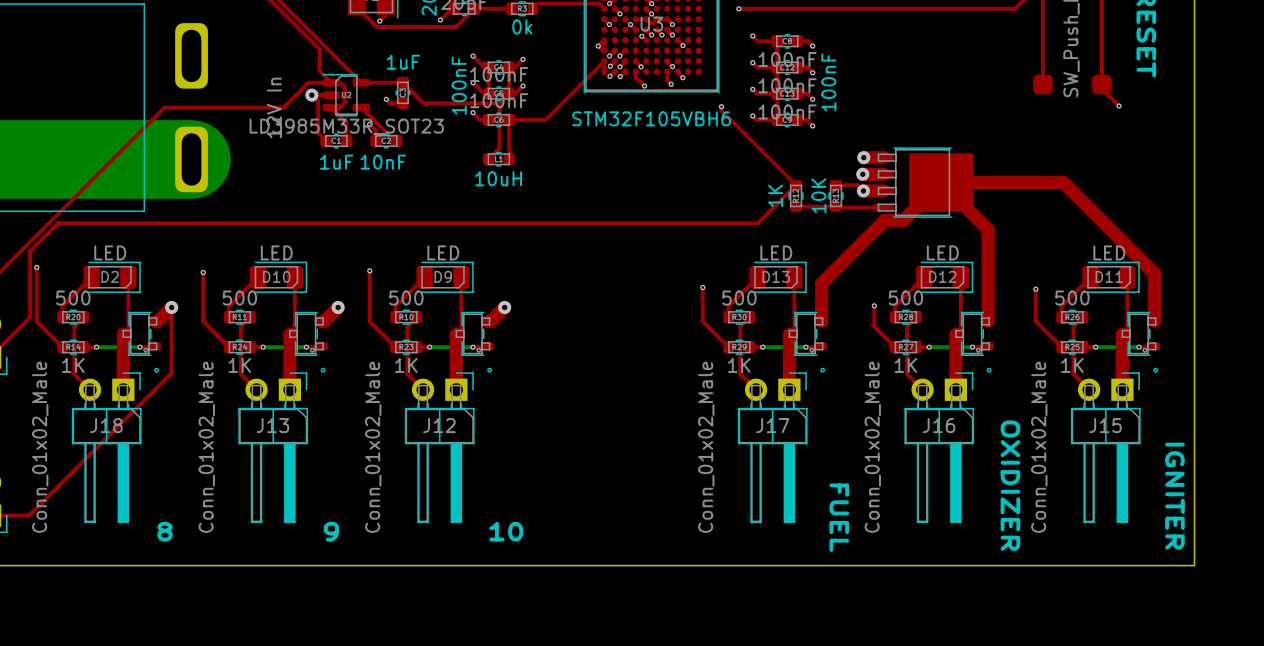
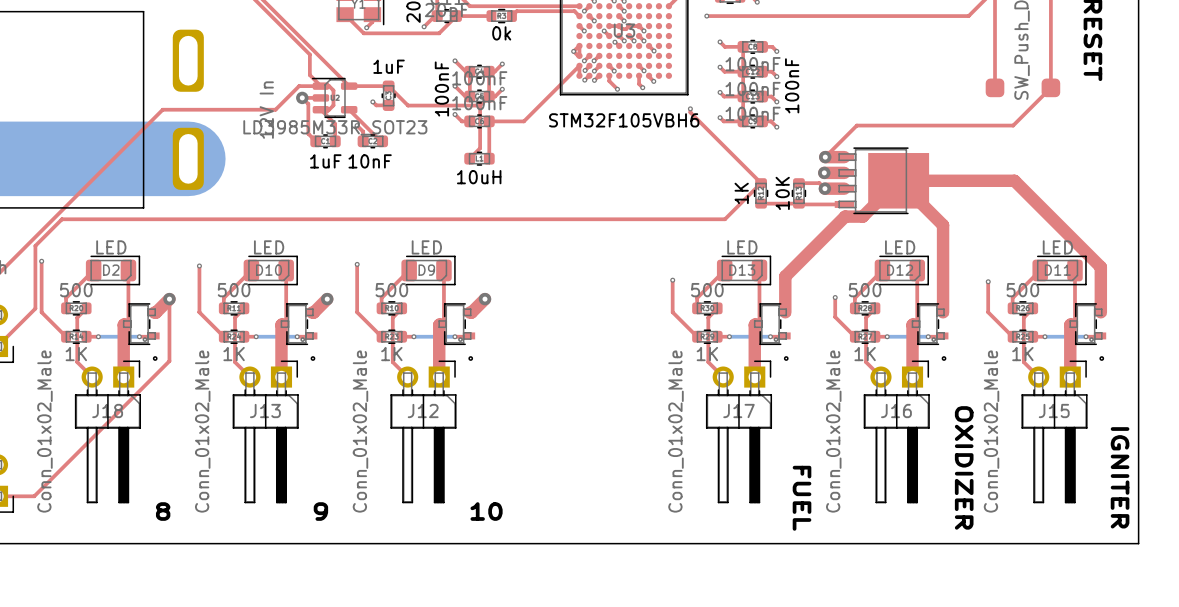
top track: (1101, 84) (1101, 88) (1119, 106) -> (1050, 87) (1013, 125) (856, 125) (825, 157)
via: (1119, 106) -> none

